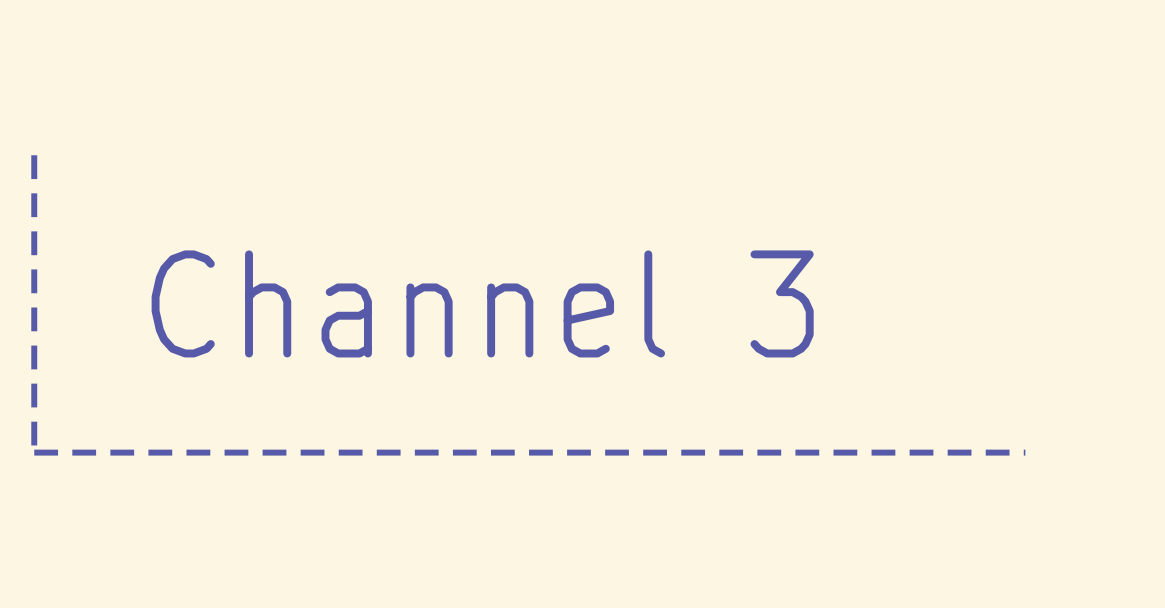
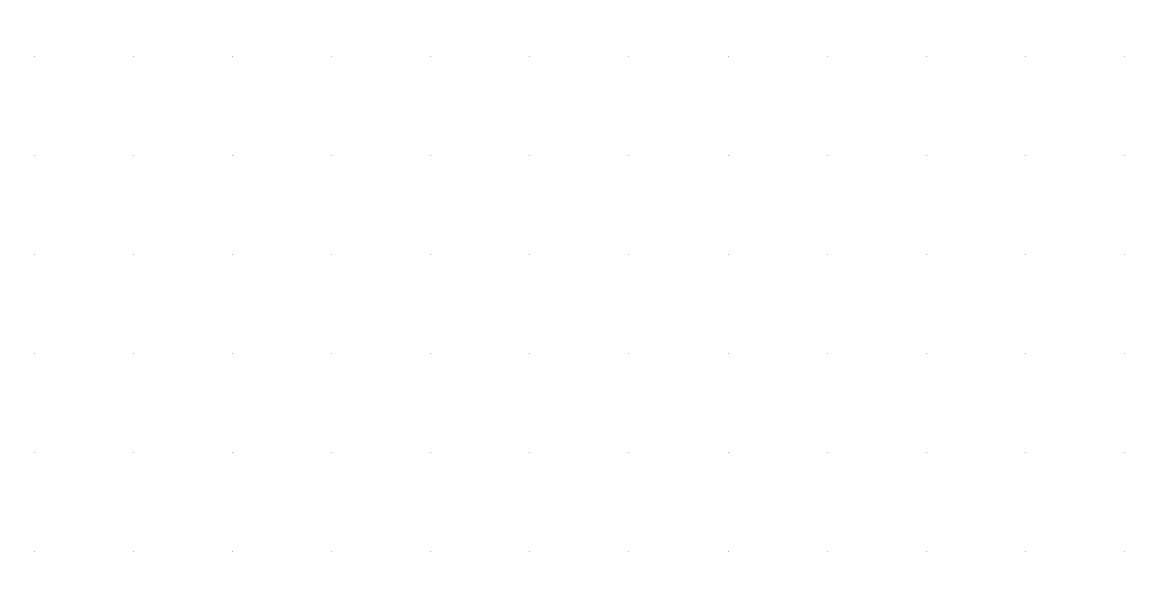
line: (34, 155) (34, 452) (1025, 452) -> none
text: Channel 3 (482, 303) -> none

